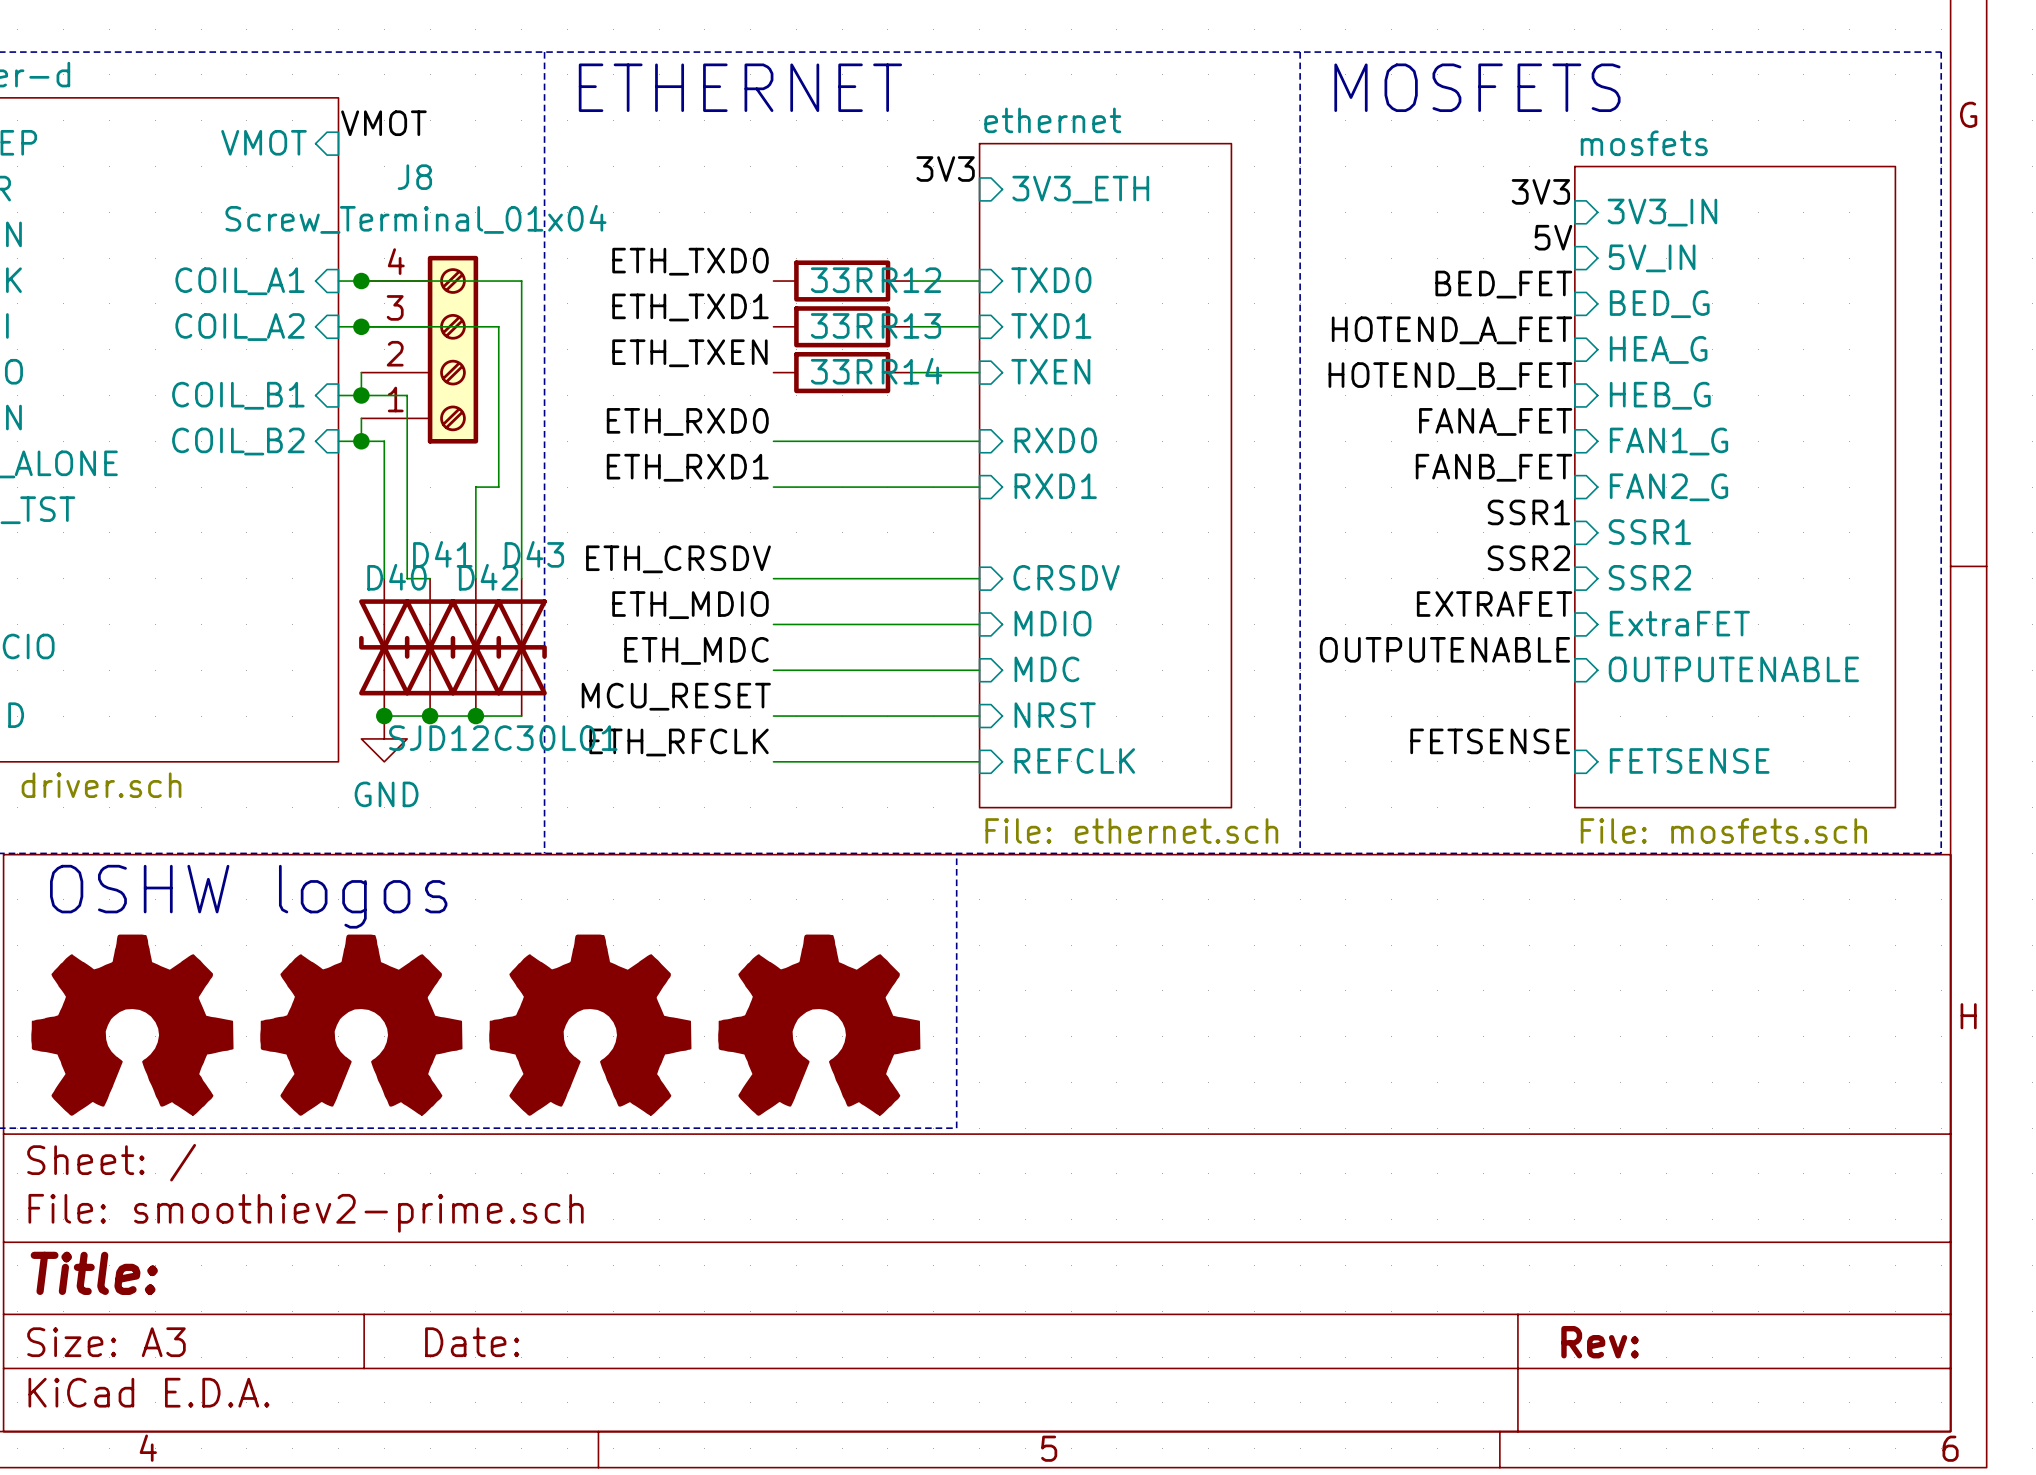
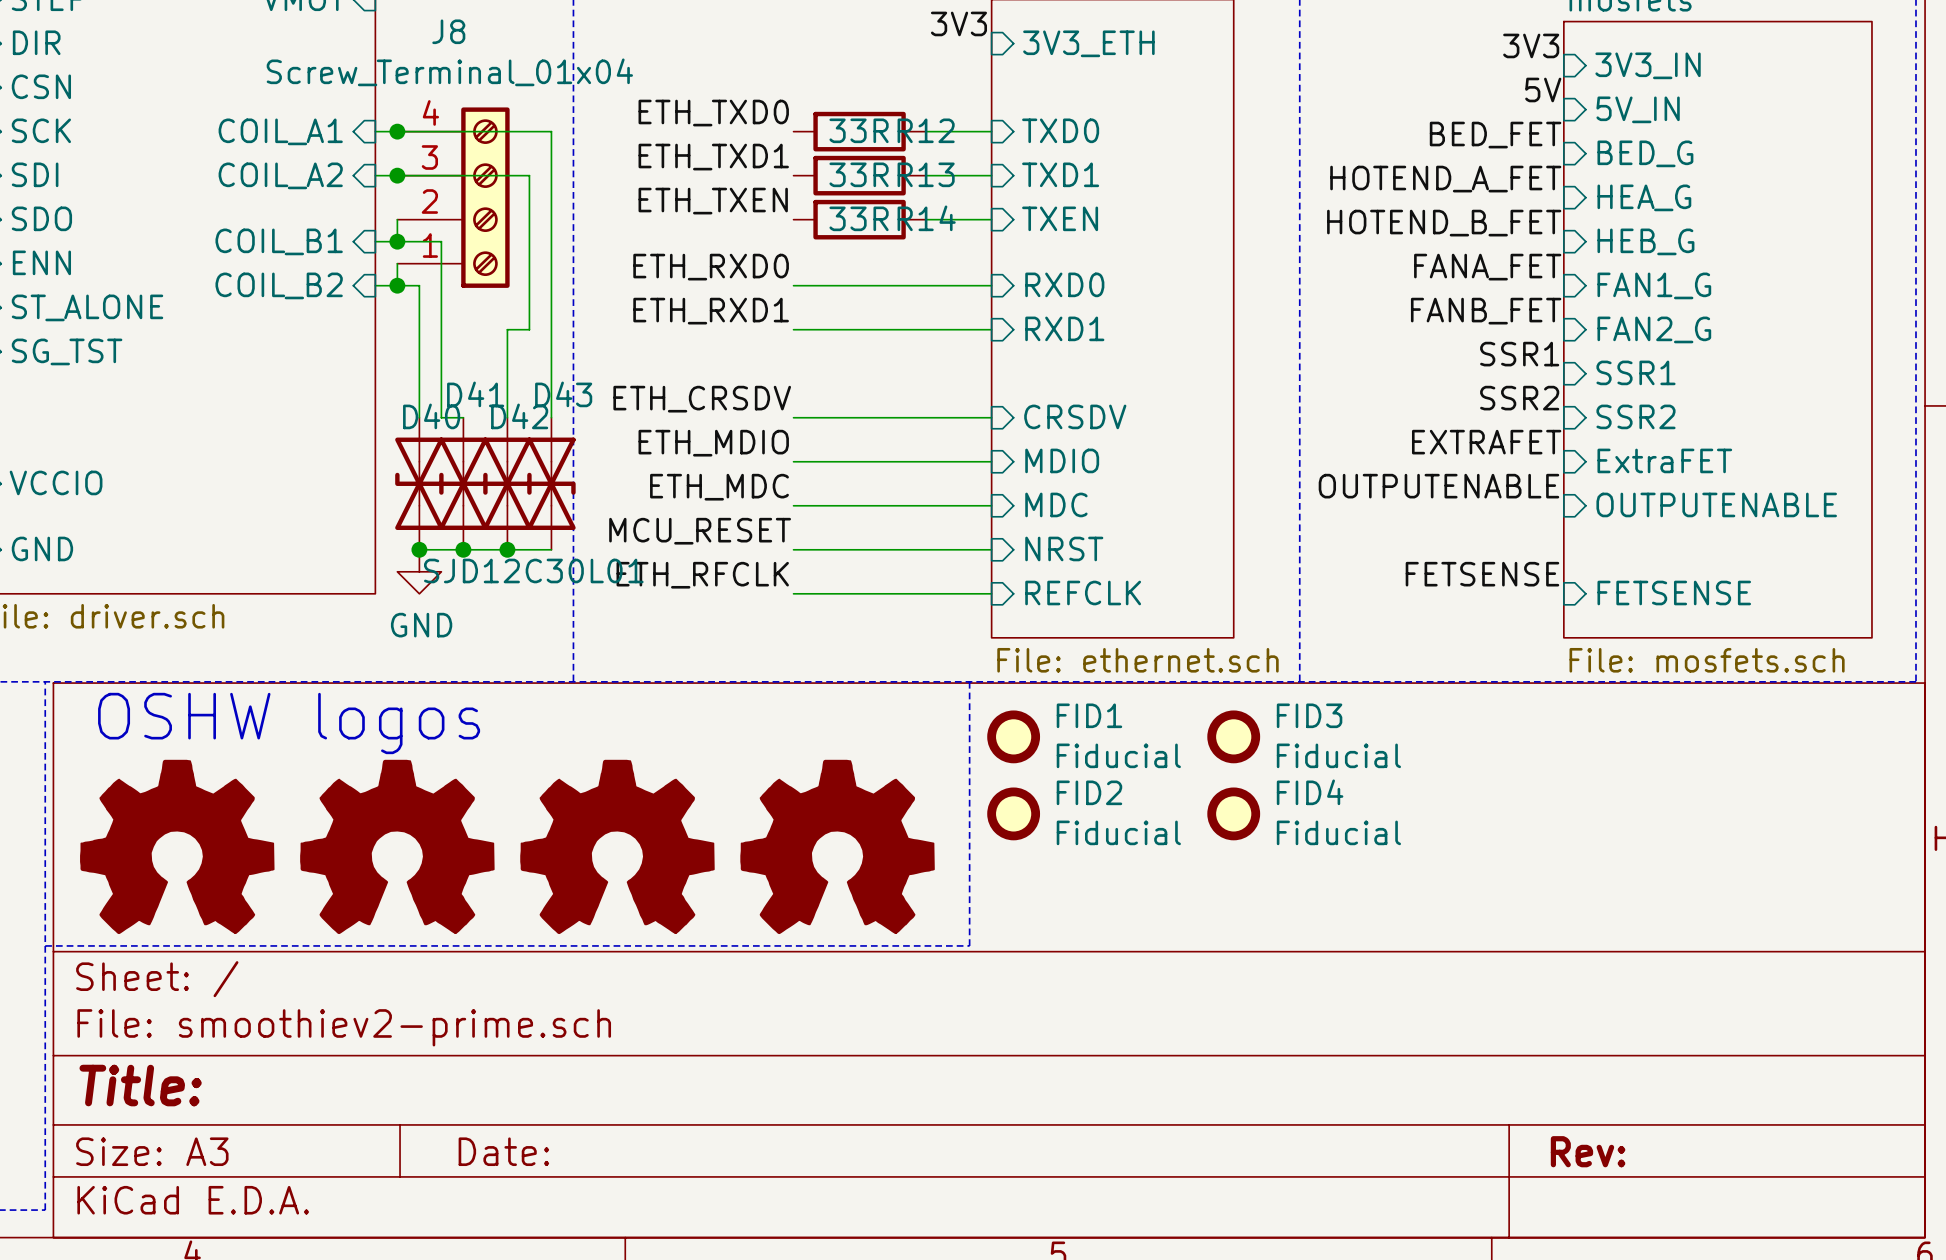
FID1: none -> Fiducial (1013, 736)
FID3: none -> Fiducial (1233, 736)
FID2: none -> Fiducial (1013, 813)
FID4: none -> Fiducial (1233, 813)

